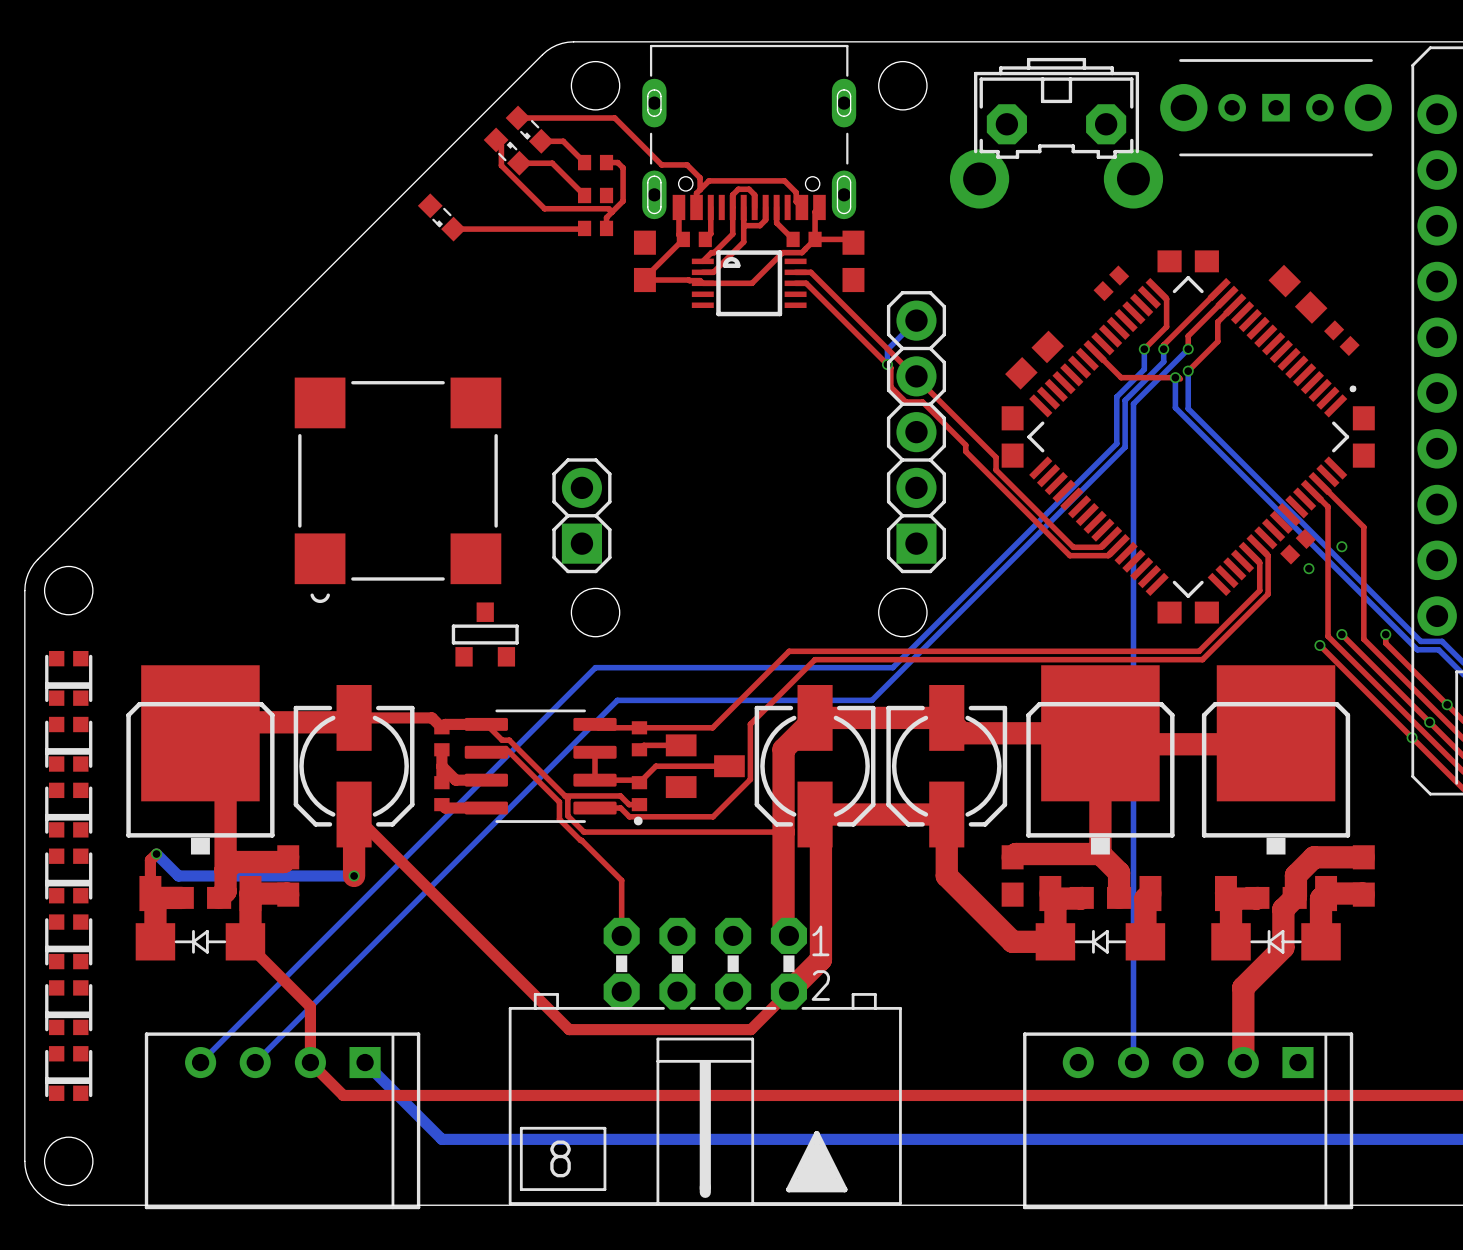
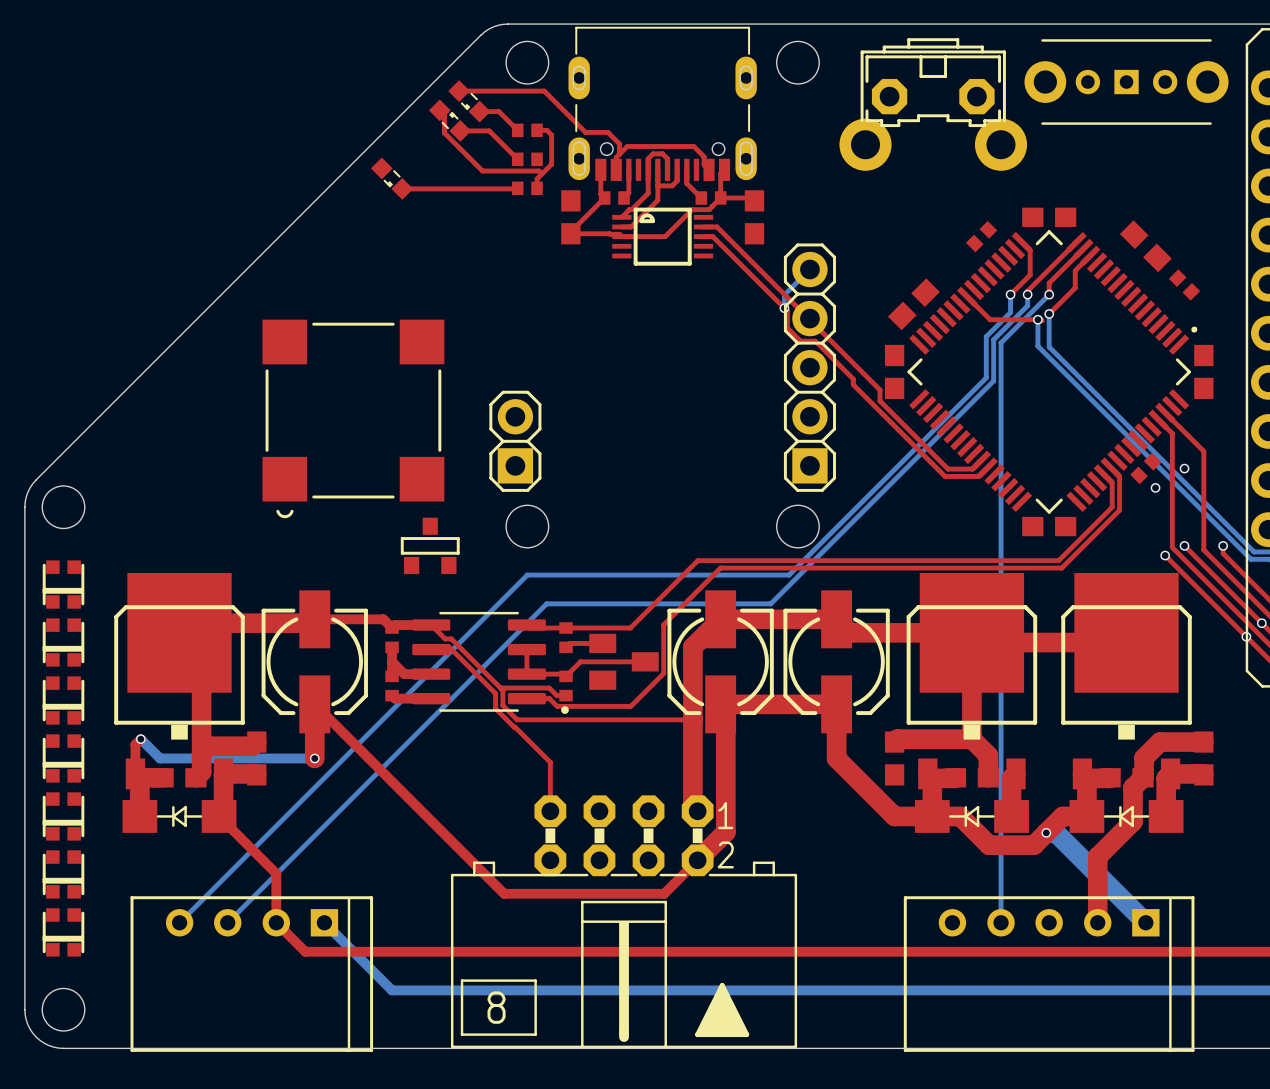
top track: none -> (932, 816) (960, 816) (989, 845) (1034, 845) (1062, 816) (1086, 816)
bottom track: none -> (1046, 832) (1055, 832) (1145, 922)
via: none -> (1046, 832)

